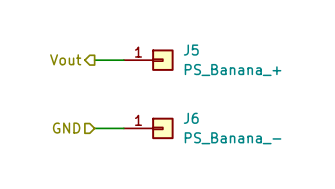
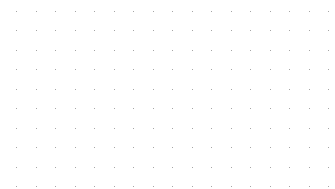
hierarchical label: Vout (65, 59) -> none
wire: (94, 60) (123, 60) -> none
J5: PS_Banana_+ (148, 60) -> none
hierarchical label: GND (66, 128) -> none
wire: (94, 128) (123, 128) -> none
J6: PS_Banana_- (148, 128) -> none

